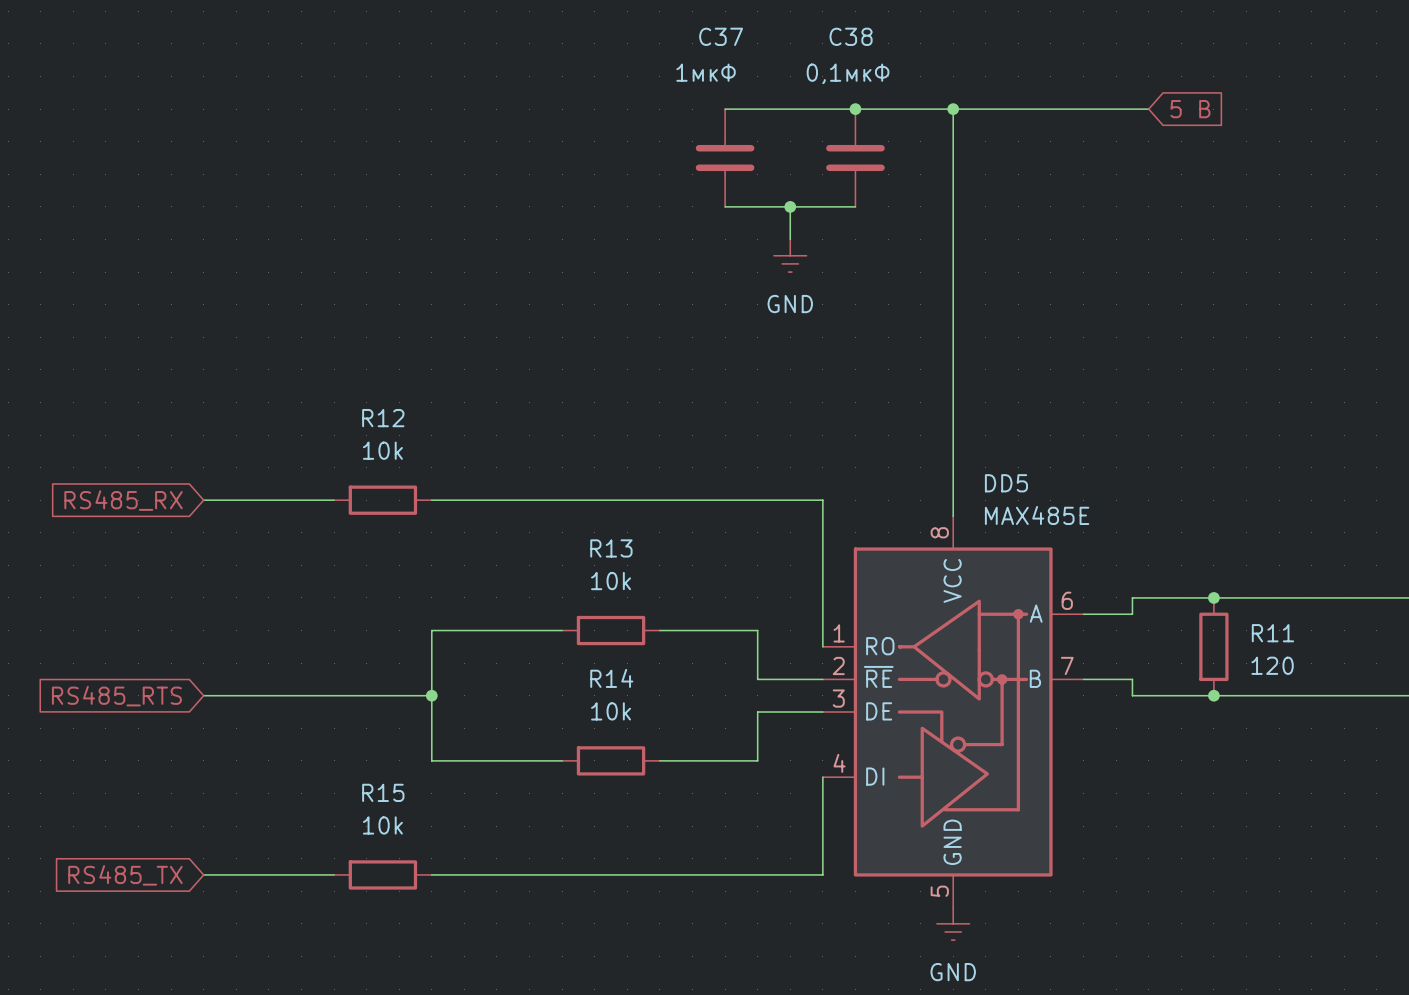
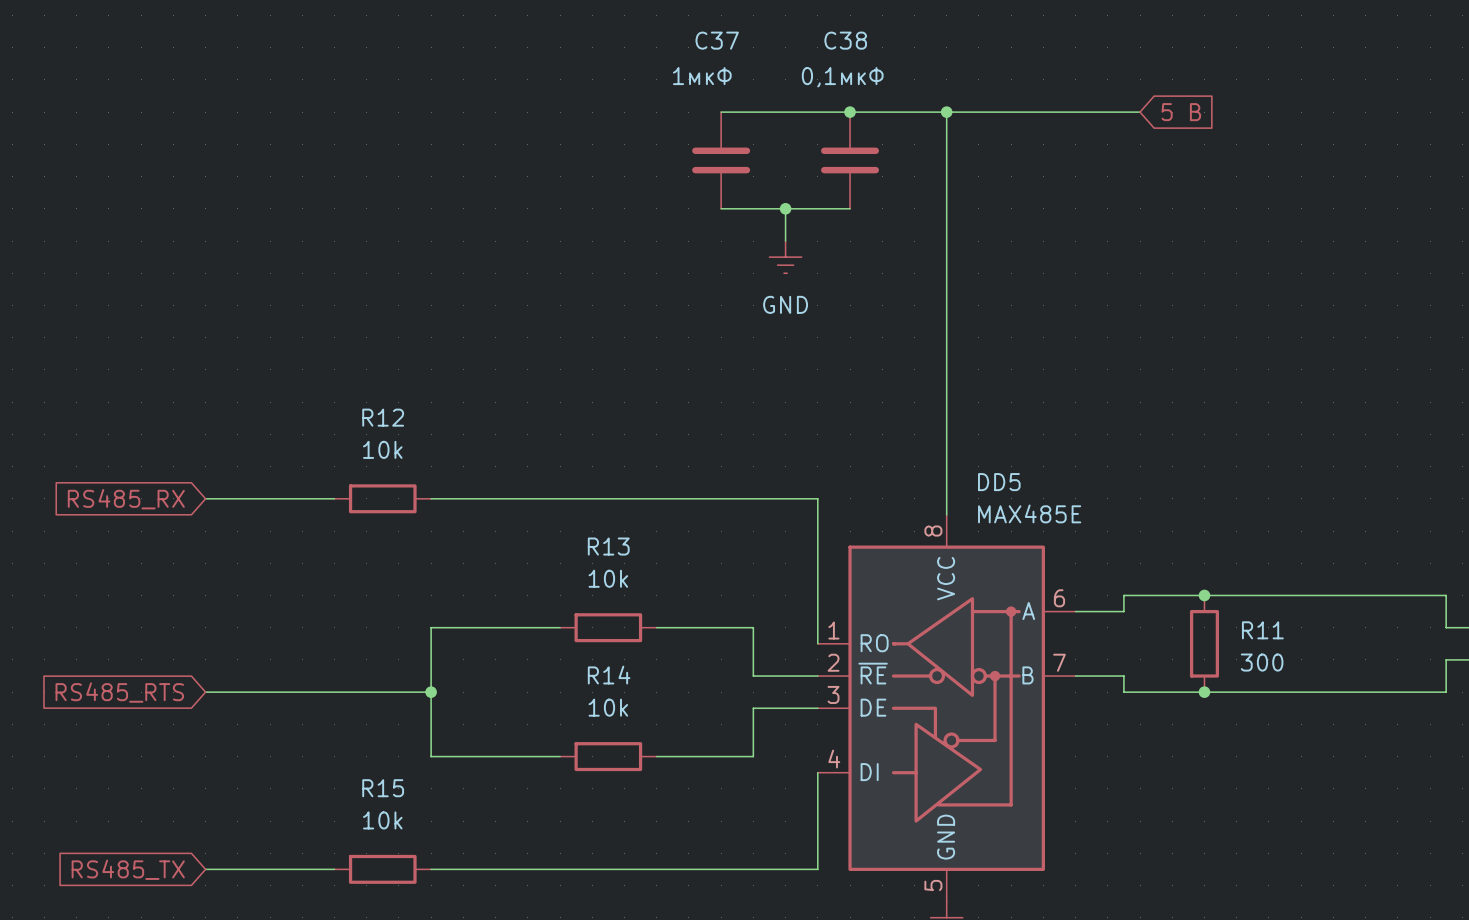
R11 value: 120 (1272, 665) -> 300 (1262, 662)

